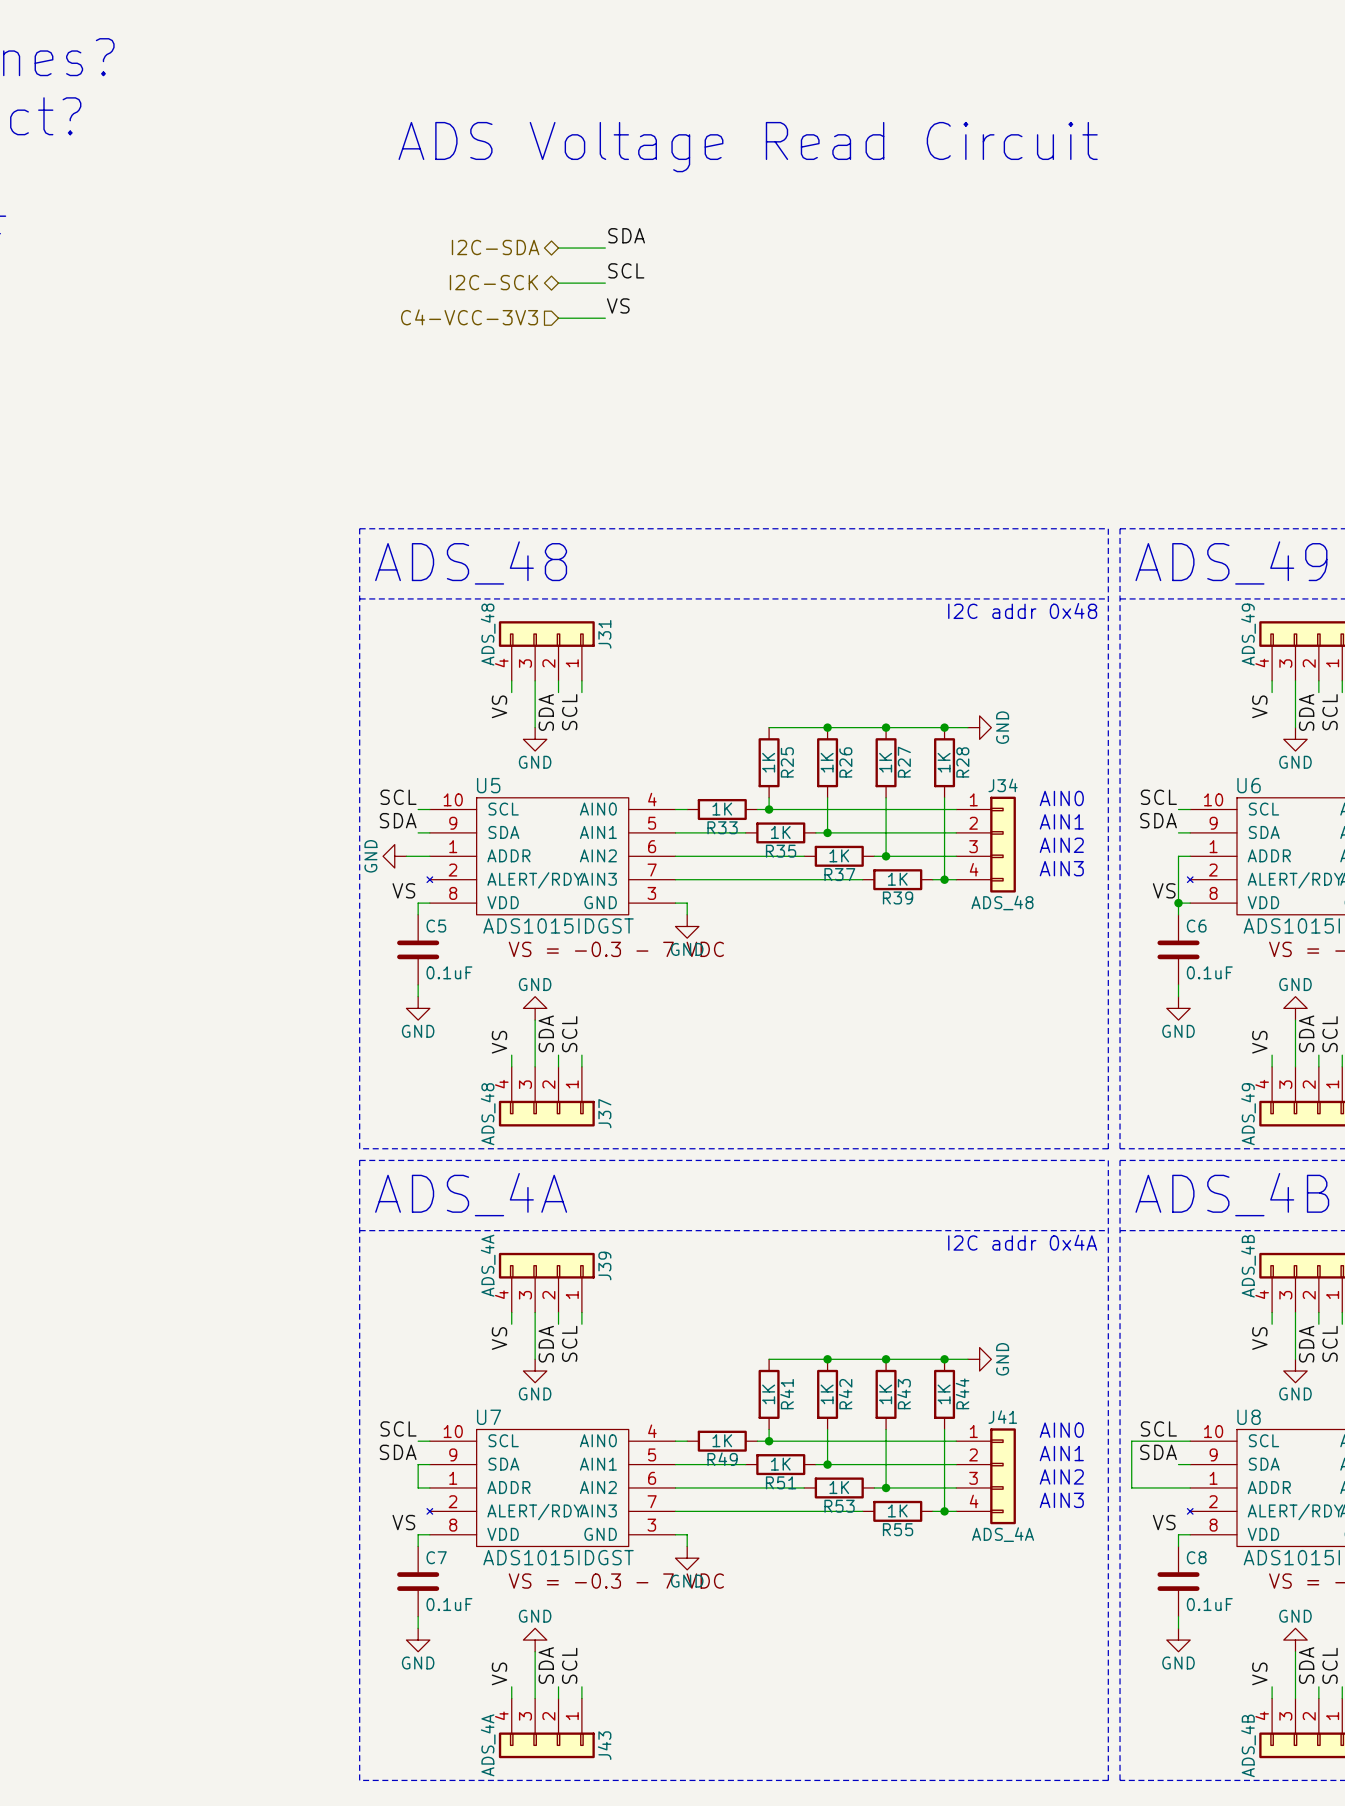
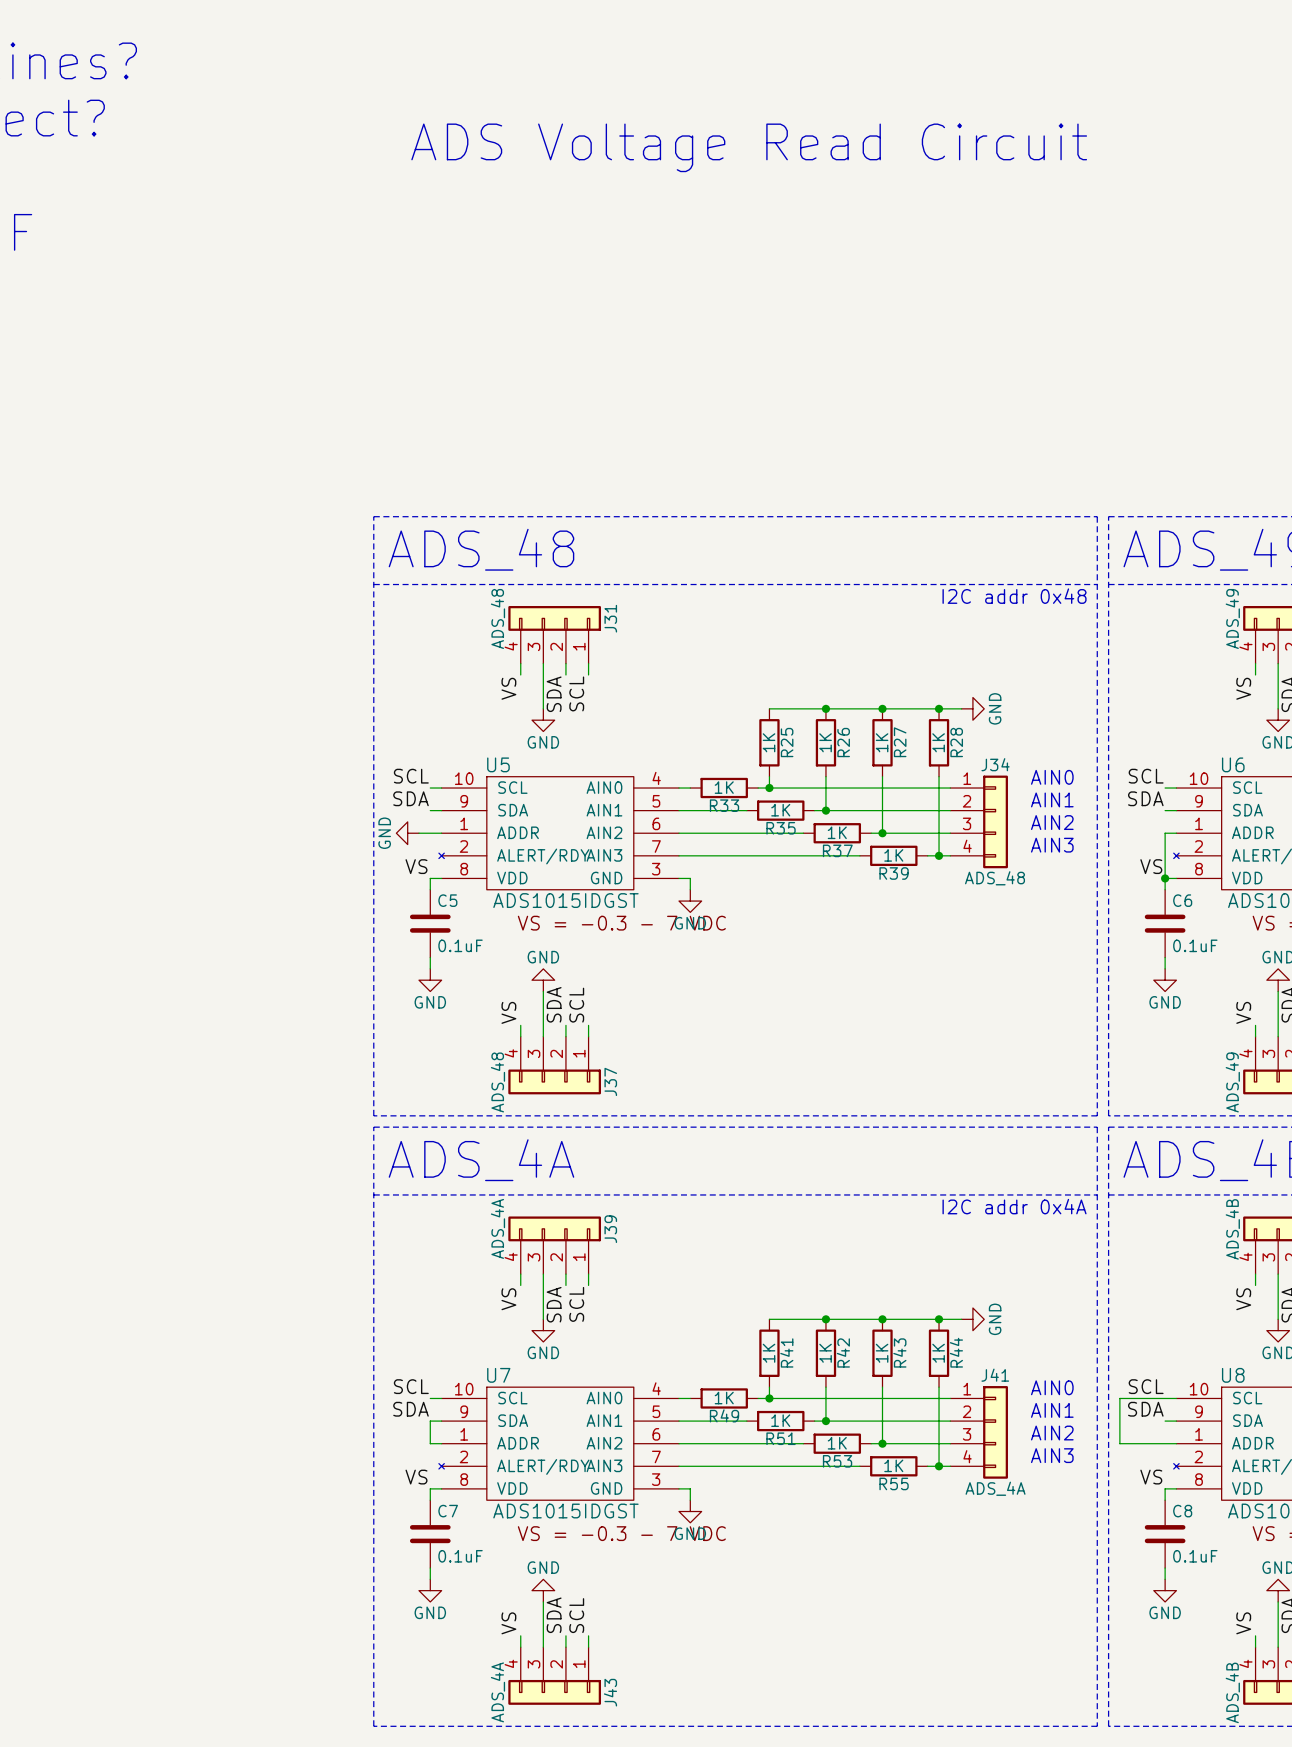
label: SDA (626, 235) -> none
hierarchical label: I2C-SDA (495, 247) -> none
wire: (558, 248) (605, 248) -> none
label: SCL (626, 270) -> none
hierarchical label: I2C-SCK (493, 282) -> none
wire: (558, 283) (605, 283) -> none
label: VS (618, 305) -> none
hierarchical label: C4-VCC-3V3 (469, 317) -> none
wire: (558, 318) (605, 318) -> none

